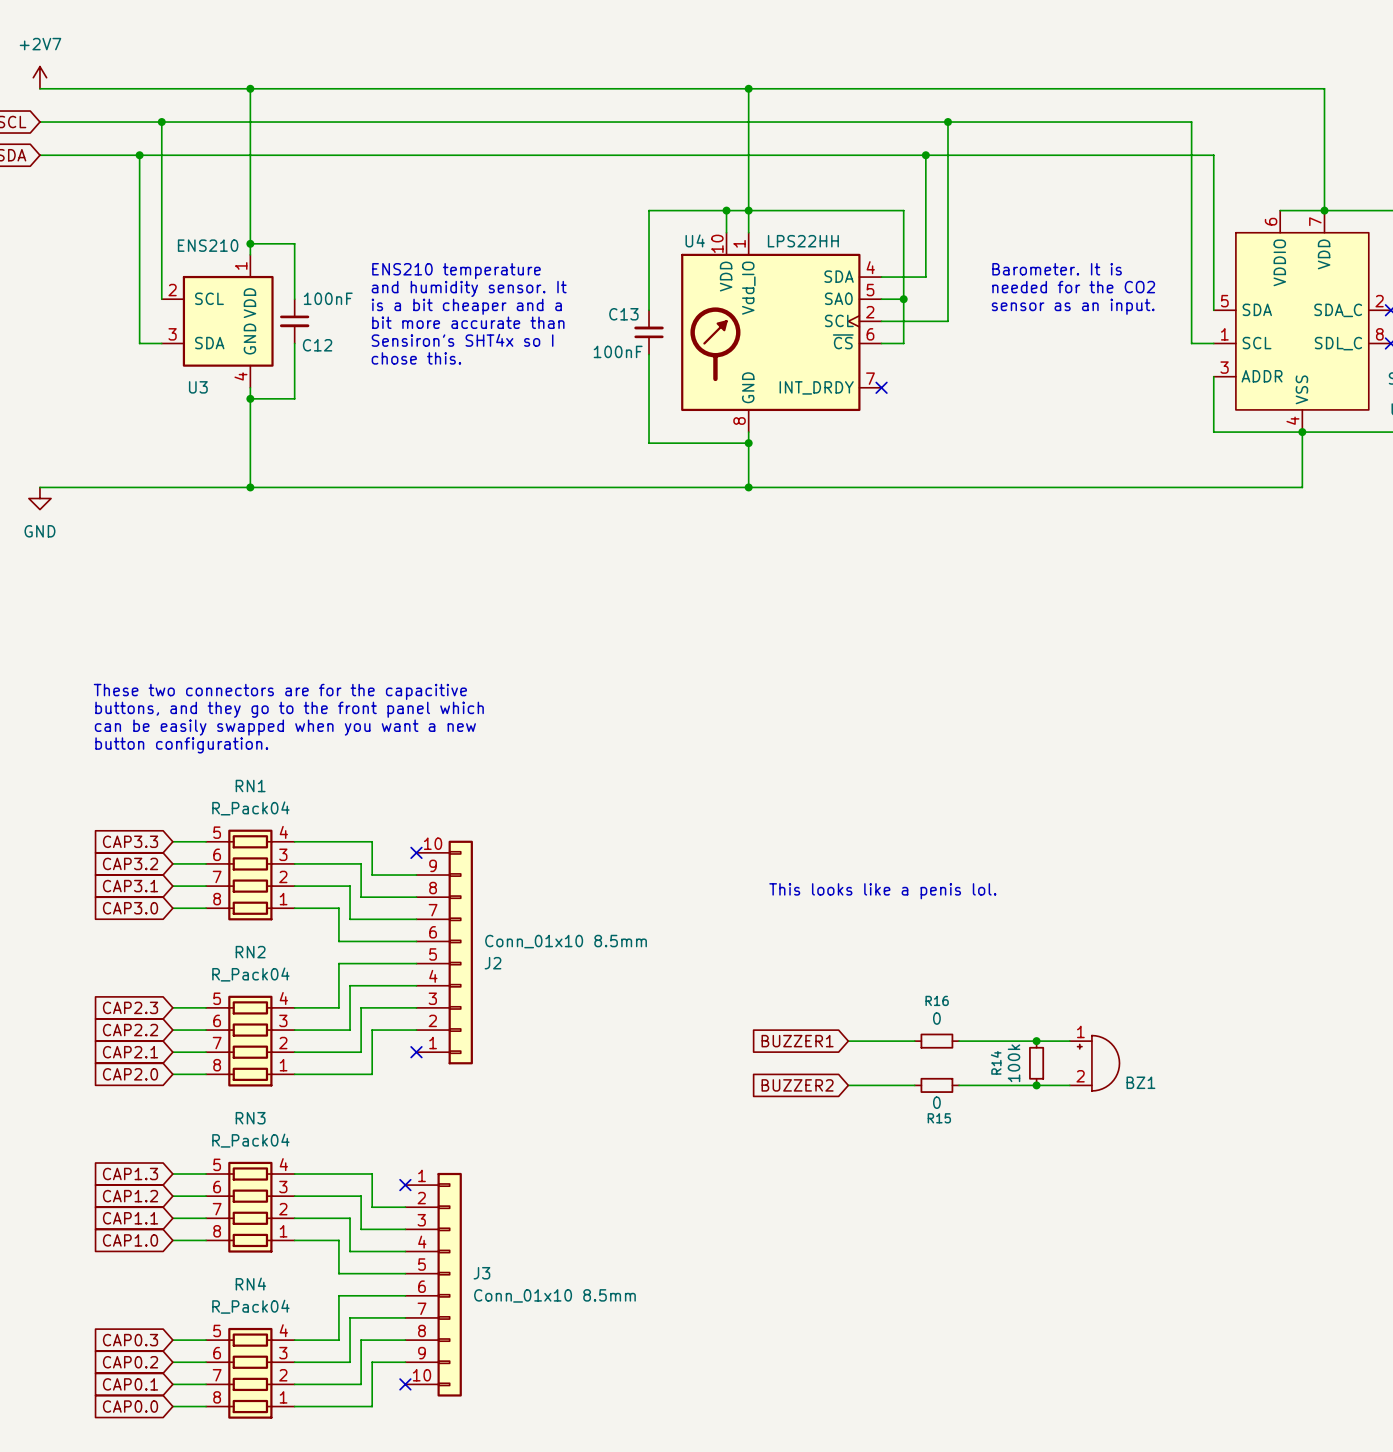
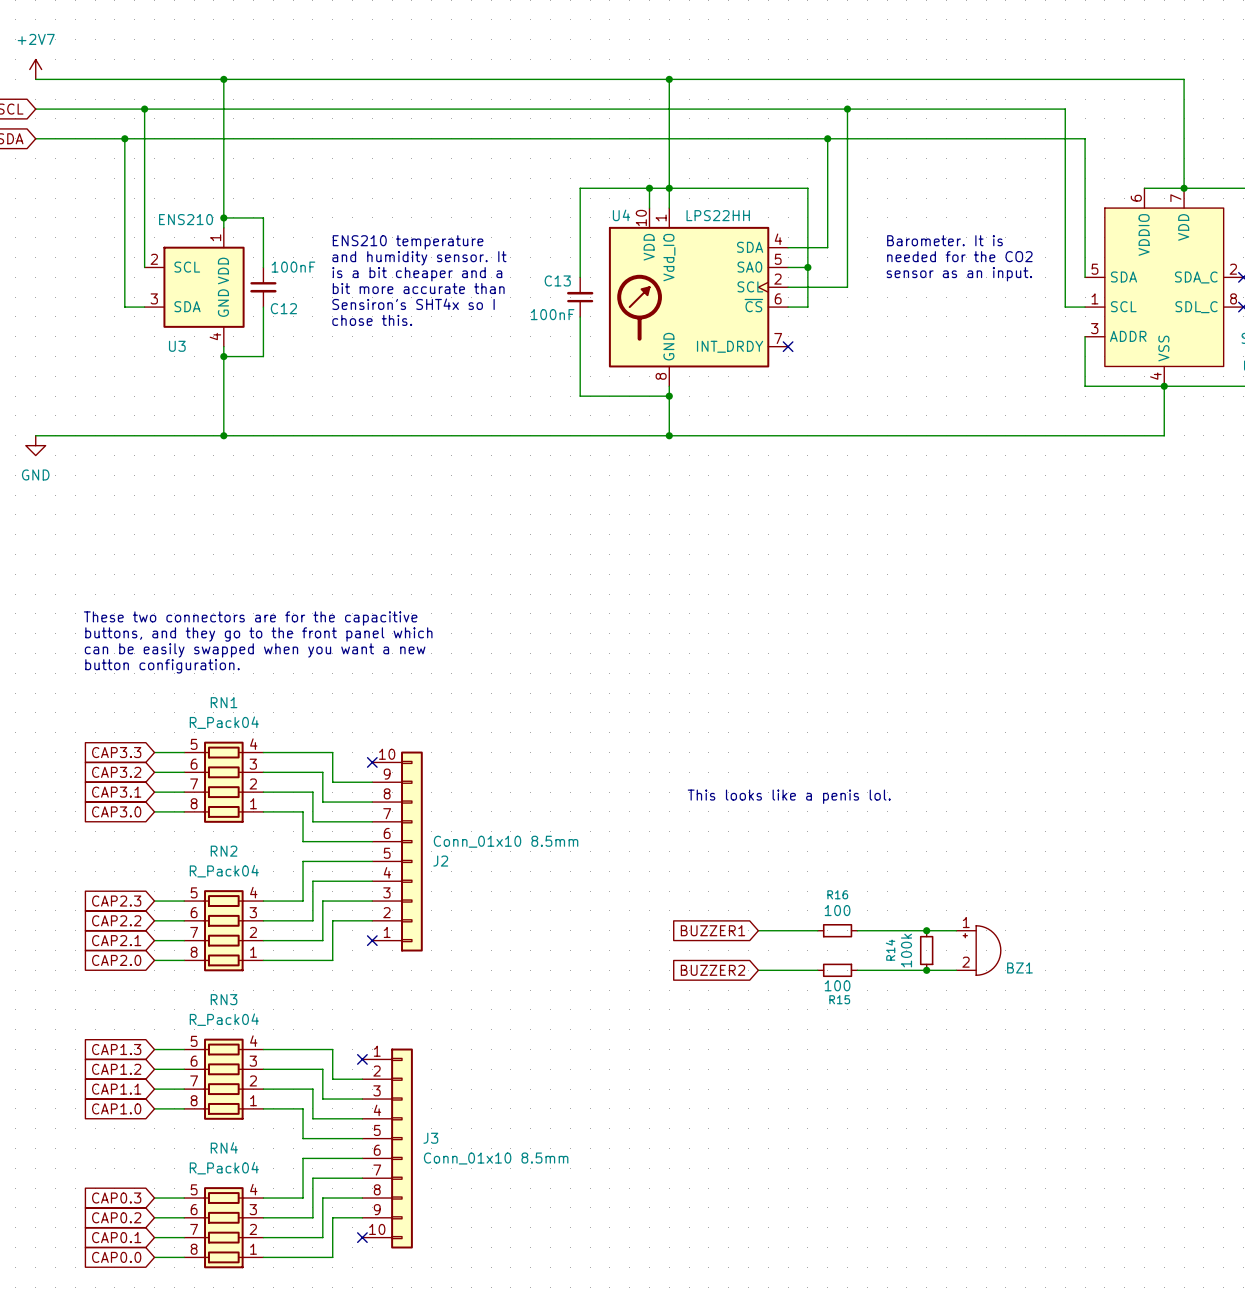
R16 value: 0 (936, 1018) -> 100 (837, 910)
R15 value: 0 (936, 1102) -> 100 (837, 985)

